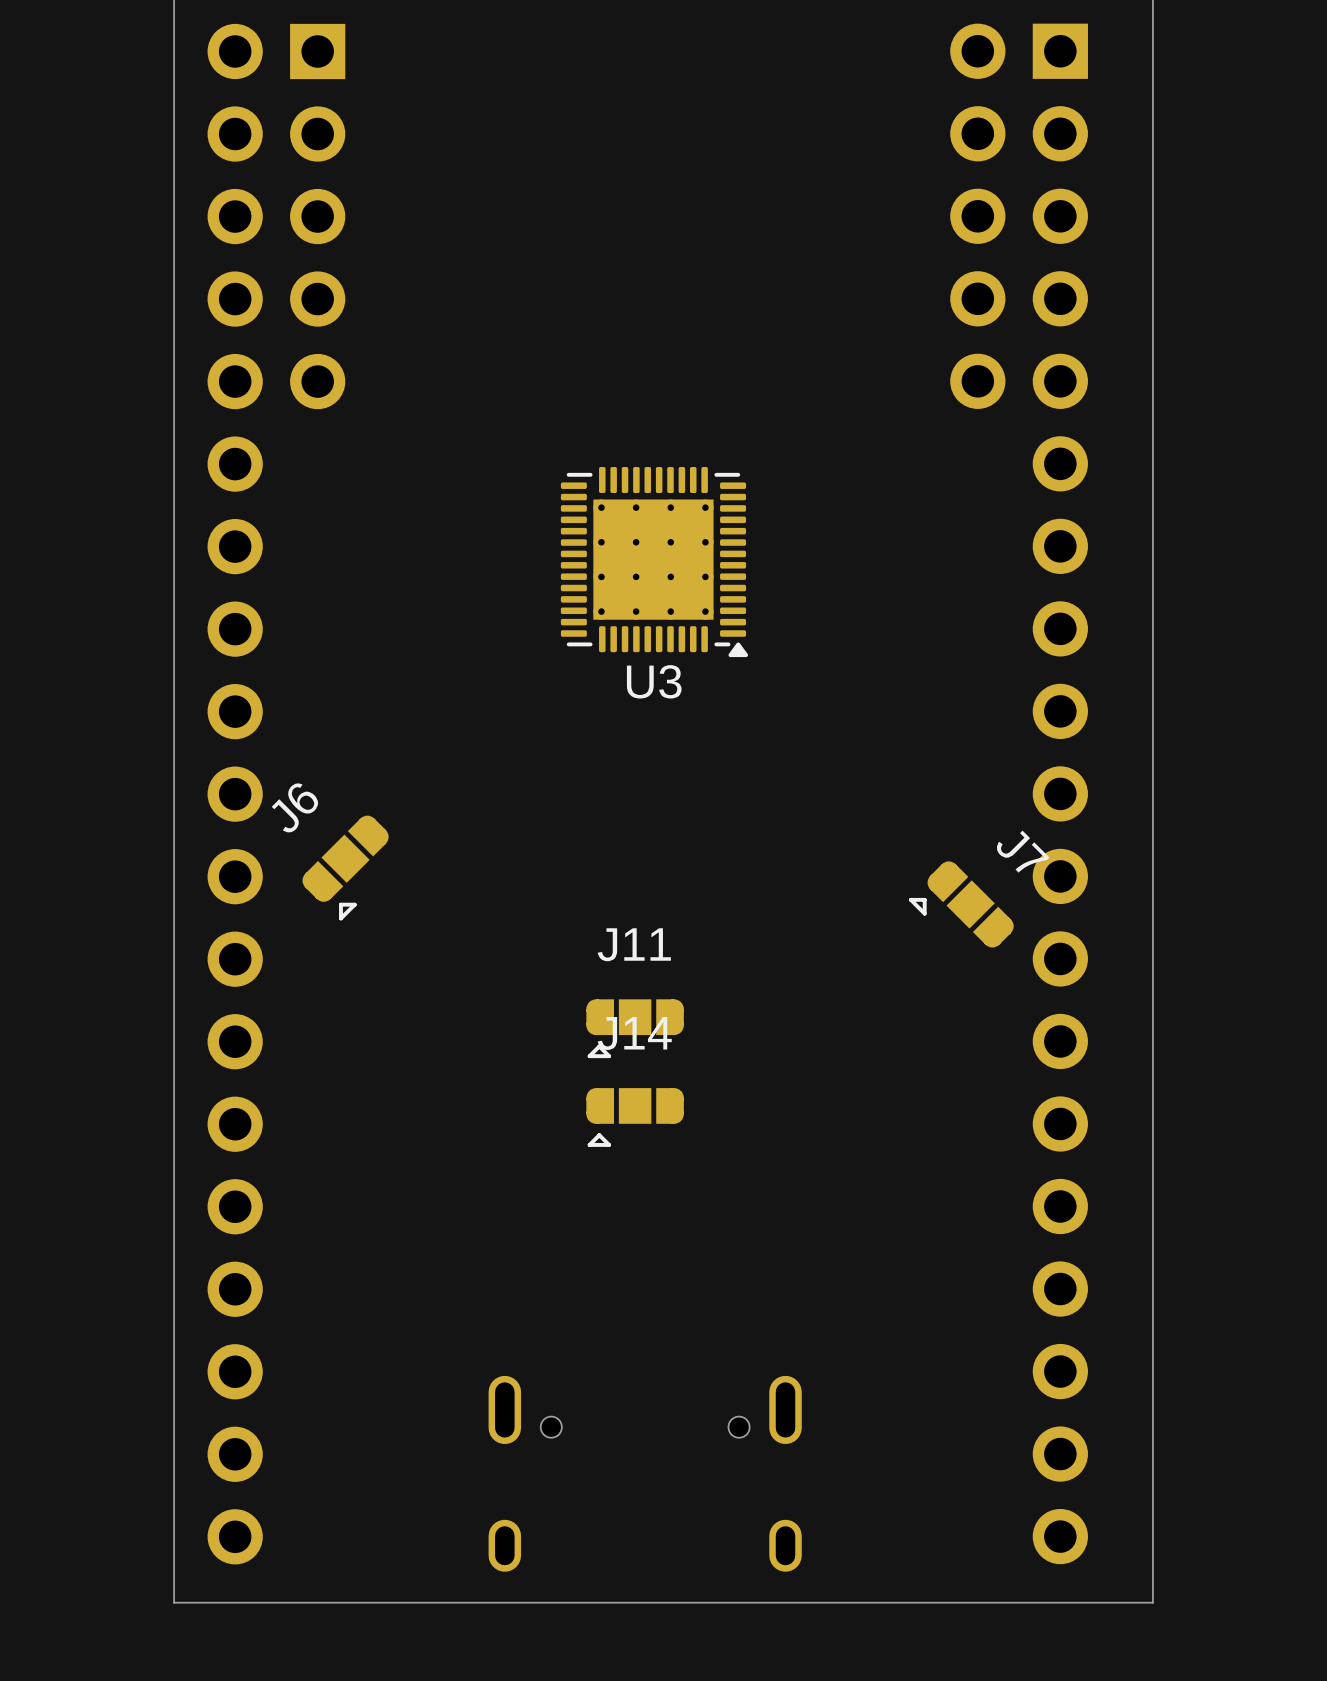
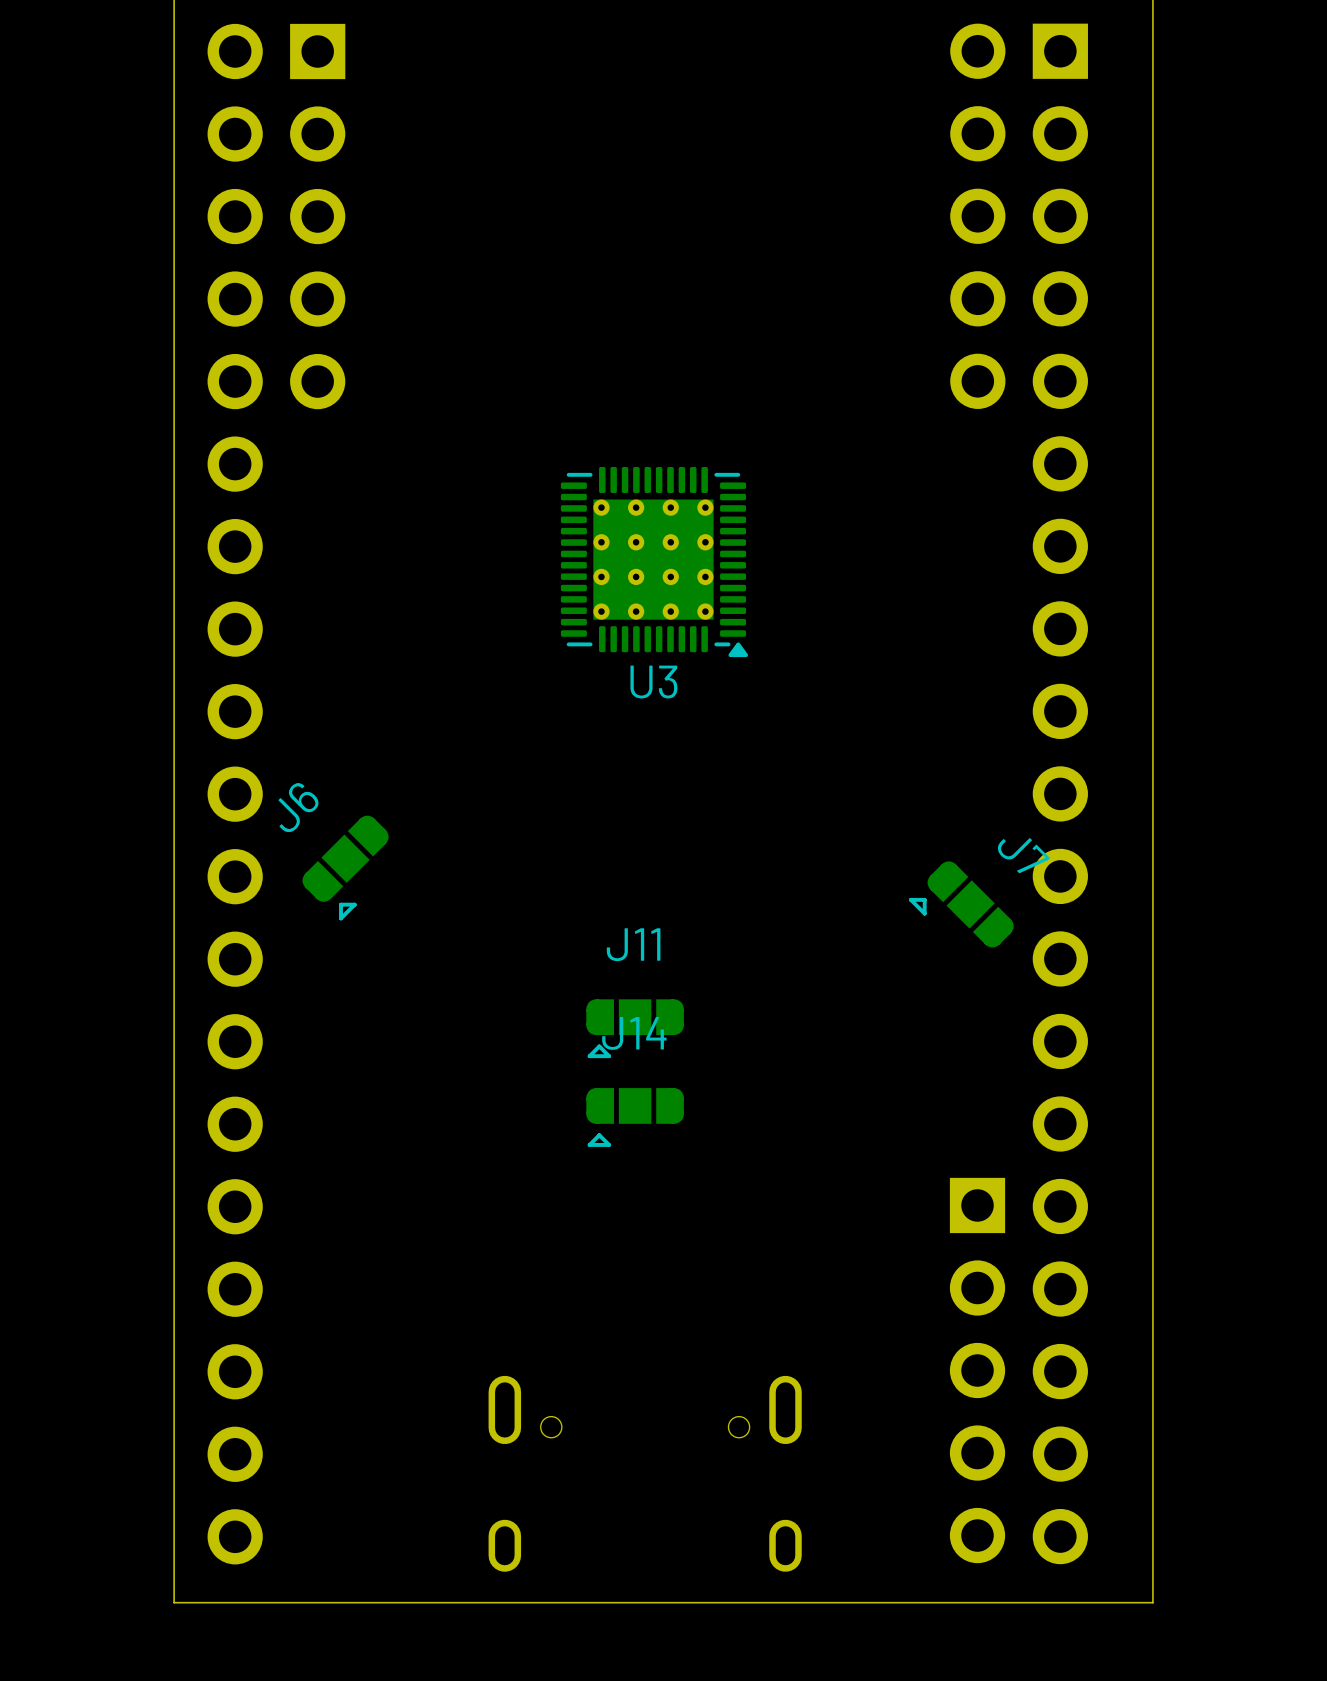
part: none -> (977, 1370)

